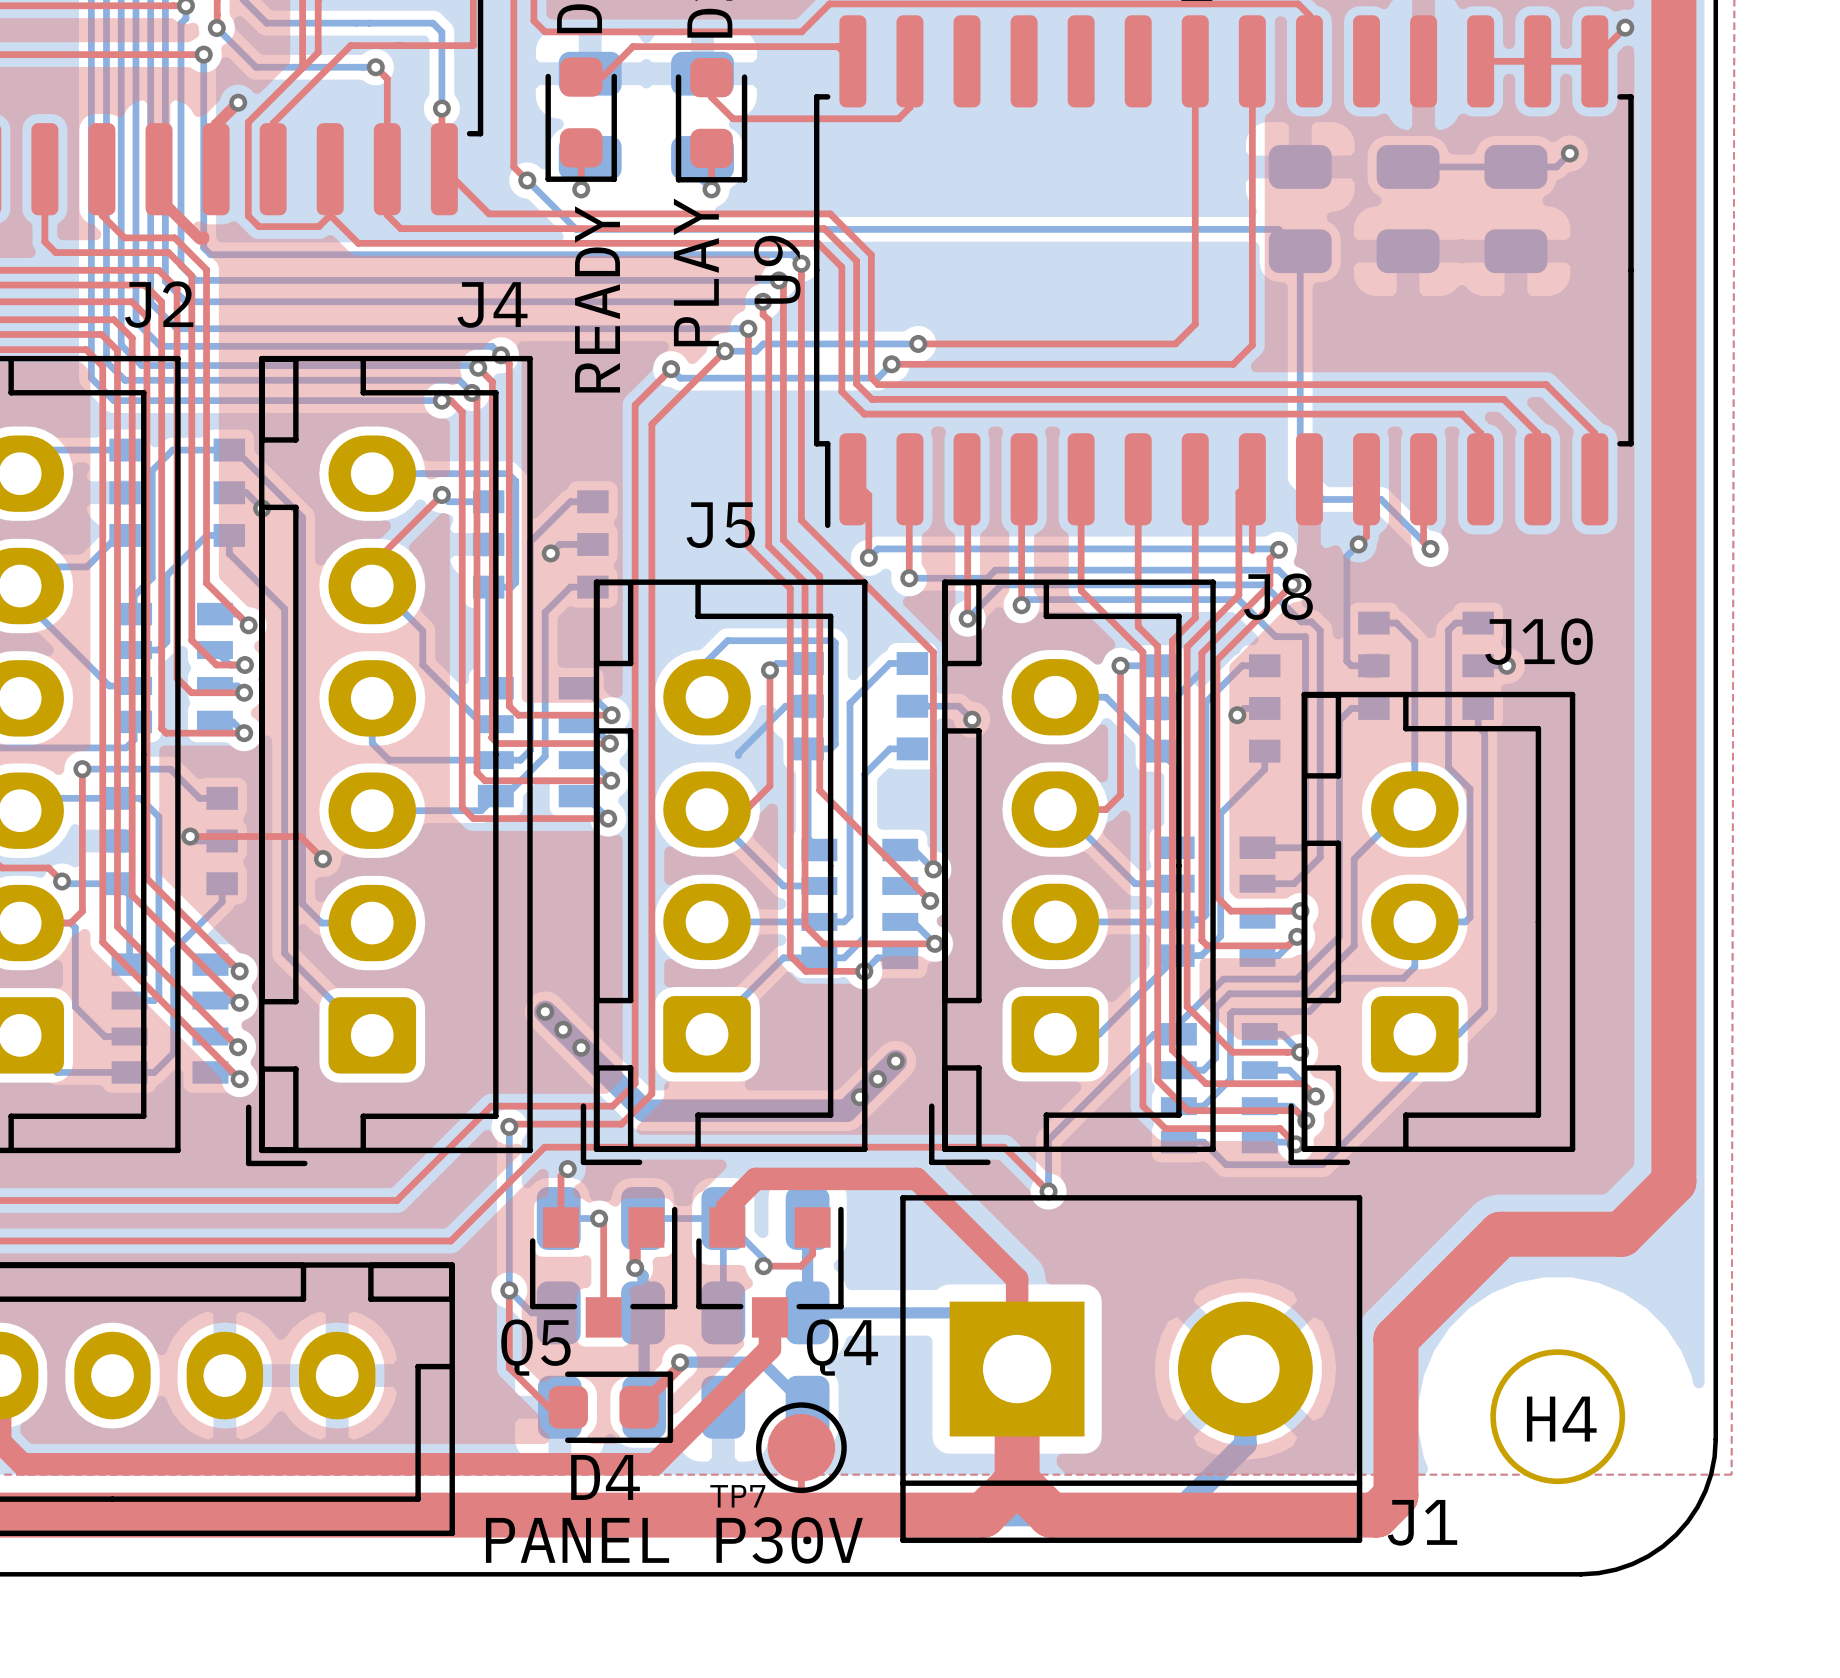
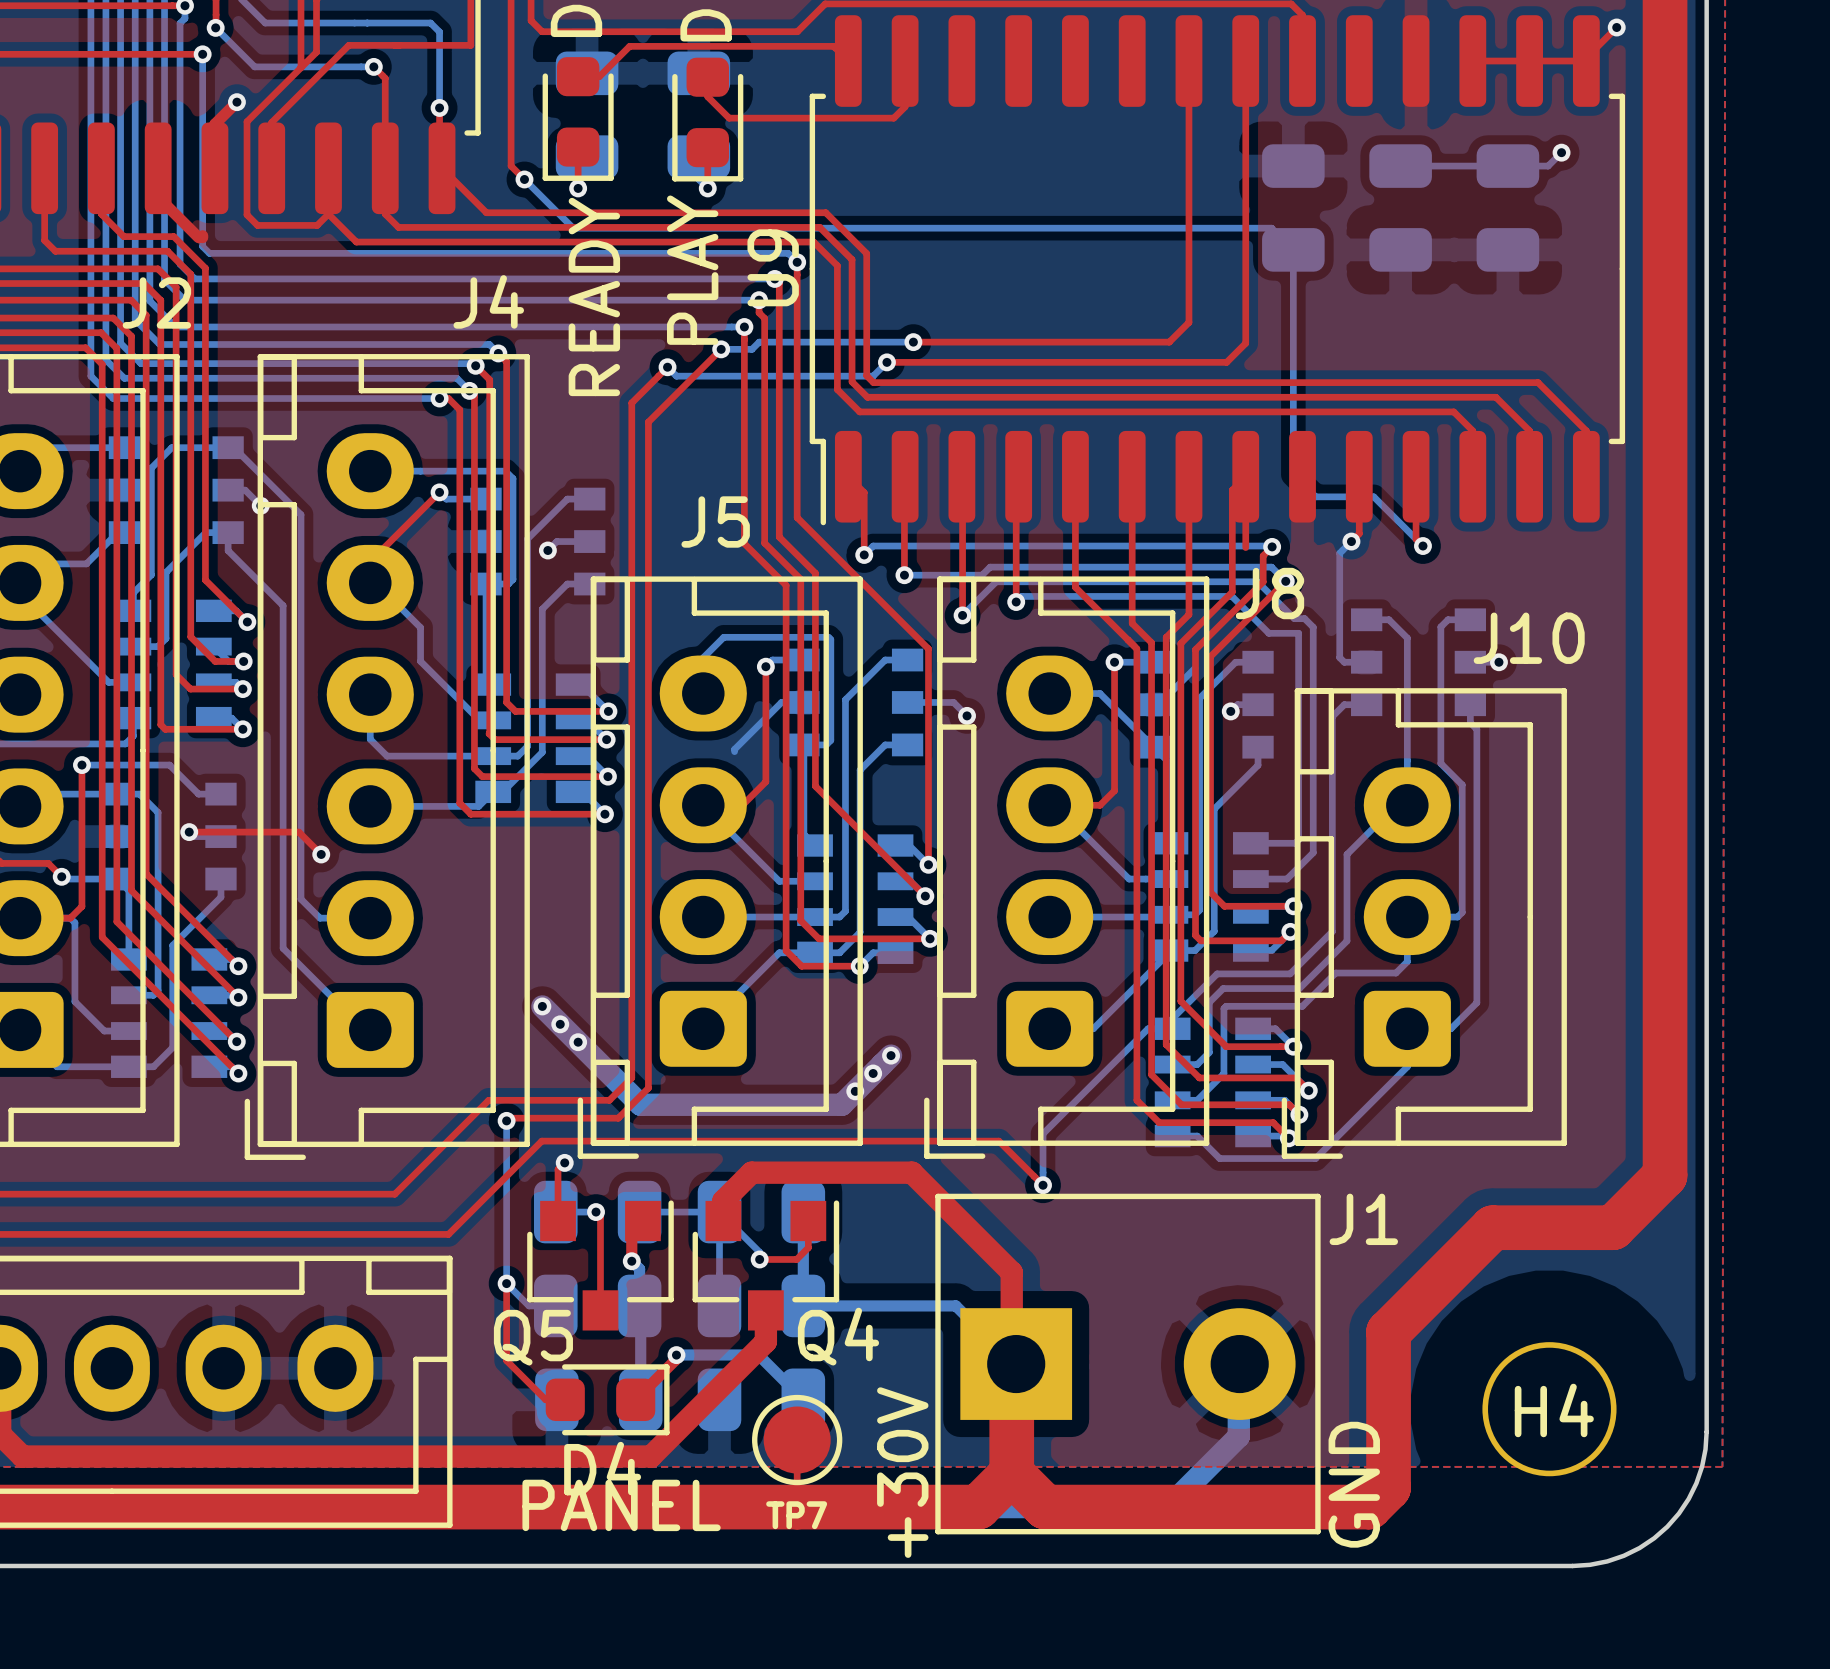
J1 footprint: [900, 1195, 1363, 1543] -> [935, 1193, 1321, 1535]
text: none -> +30V (902, 1472)
text: none -> GND (1354, 1484)
TP7 name position: TP7 (737, 1496) -> TP7 (796, 1515)
J1 name position: J1 (1422, 1522) -> J1 (1363, 1219)
D4 value position: PANEL (577, 1540) -> PANEL (621, 1505)
TP7 value: P30V (789, 1540) -> none

